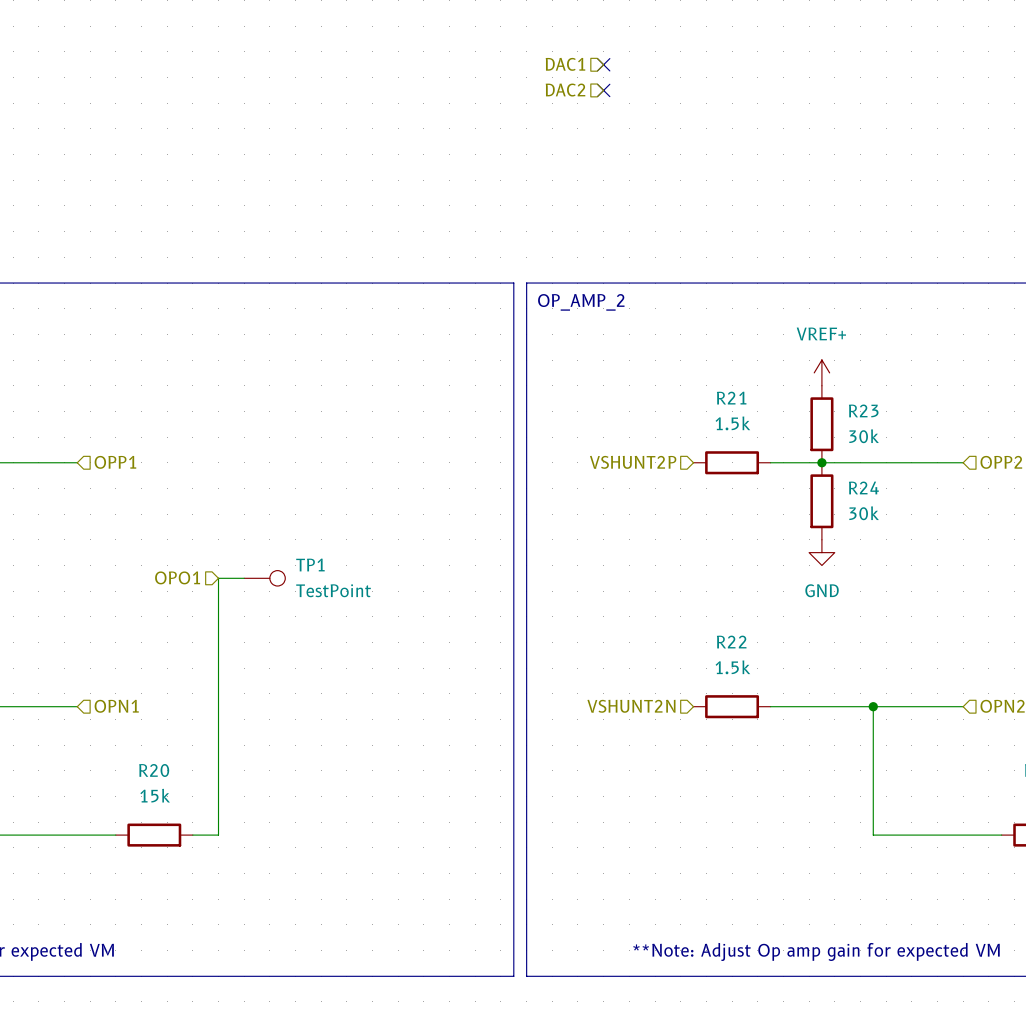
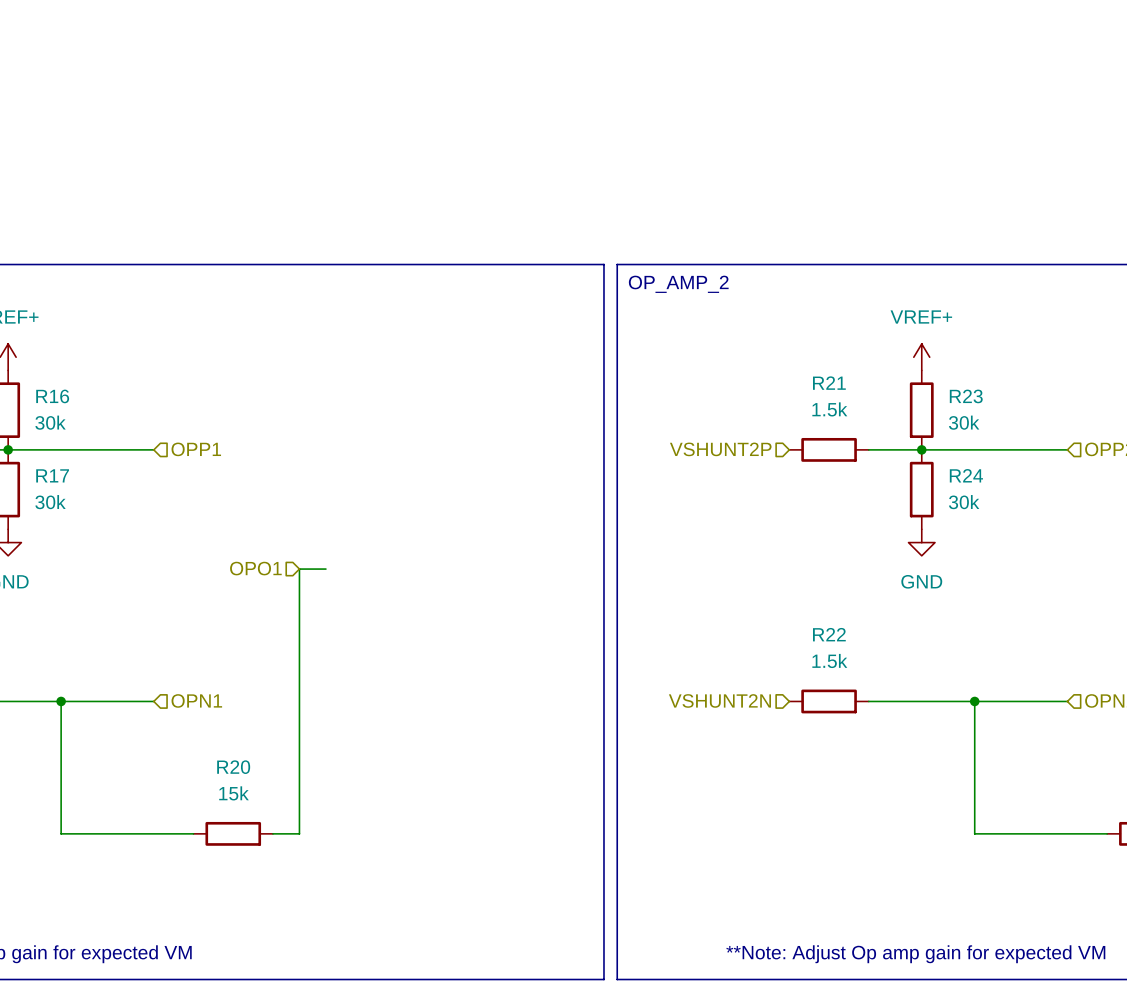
hierarchical label: DAC1 (565, 64) -> none
no-connect mark: (603, 64) -> none
hierarchical label: DAC2 (565, 90) -> none
no-connect mark: (603, 90) -> none
TP1: TestPoint (264, 578) -> none

